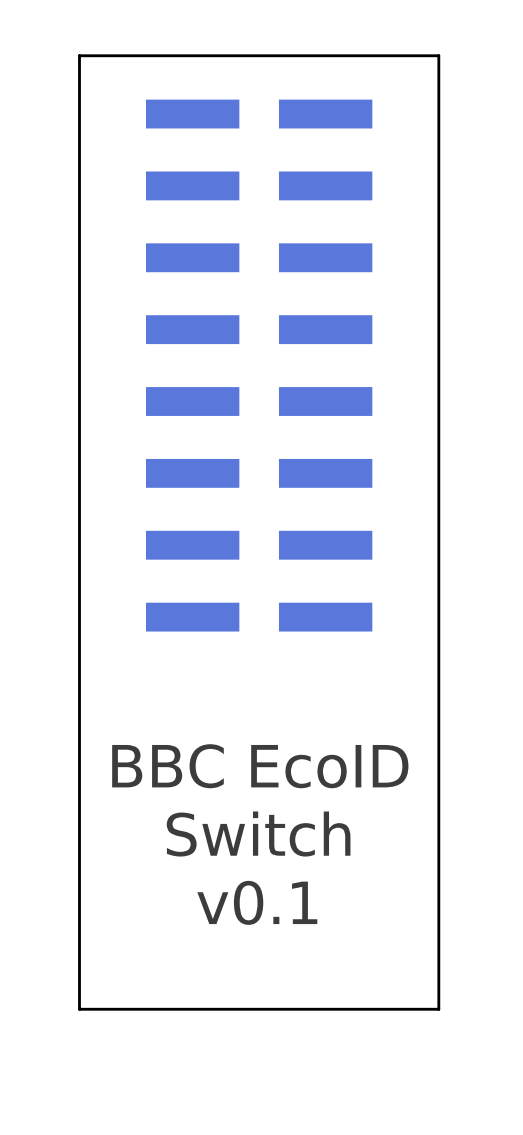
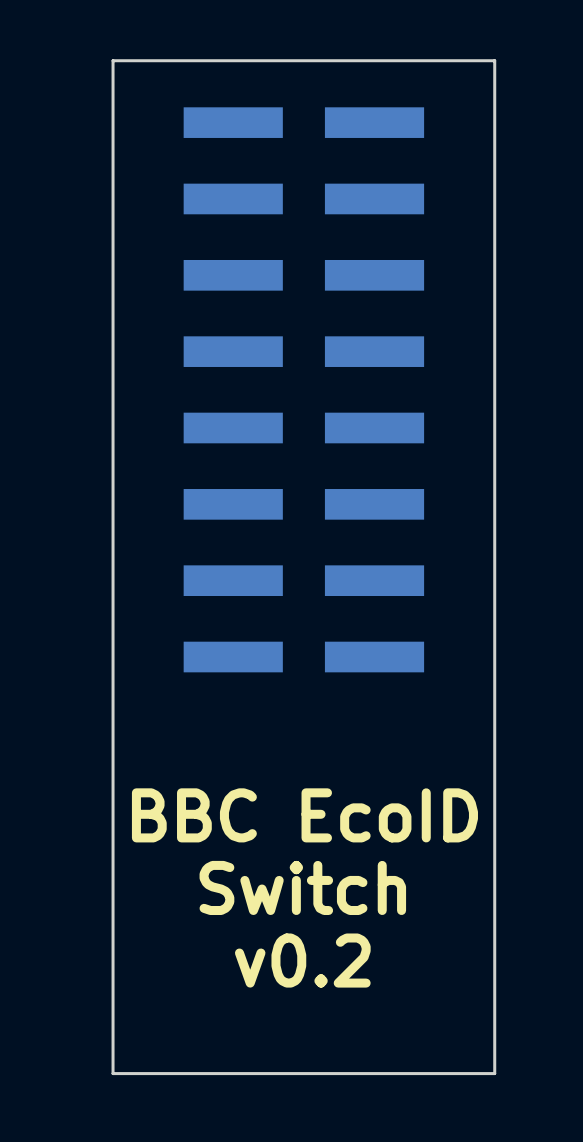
text: v0.1 (257, 902) -> v0.2 (302, 960)

